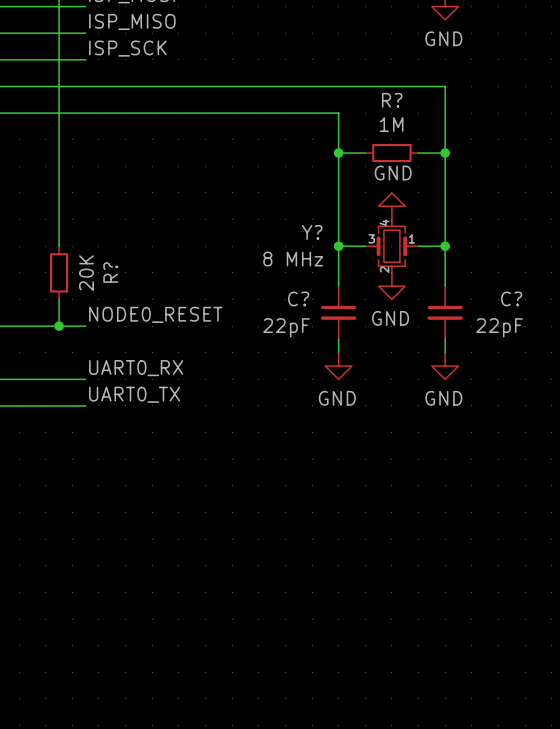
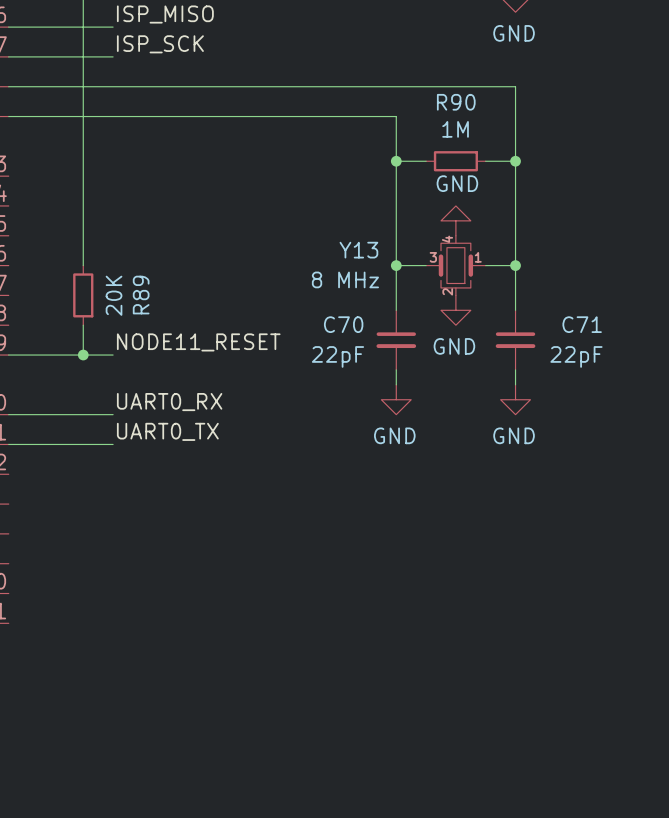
R? name: R? (392, 100) -> R90 (456, 102)
Y? name: Y? (312, 232) -> Y13 (358, 250)
R? name: R? (110, 272) -> R89 (141, 295)
C? name: C? (298, 298) -> C70 (343, 324)
C? name: C? (511, 298) -> C71 (582, 324)
label: NODE0_RESET (155, 314) -> NODE11_RESET (198, 342)

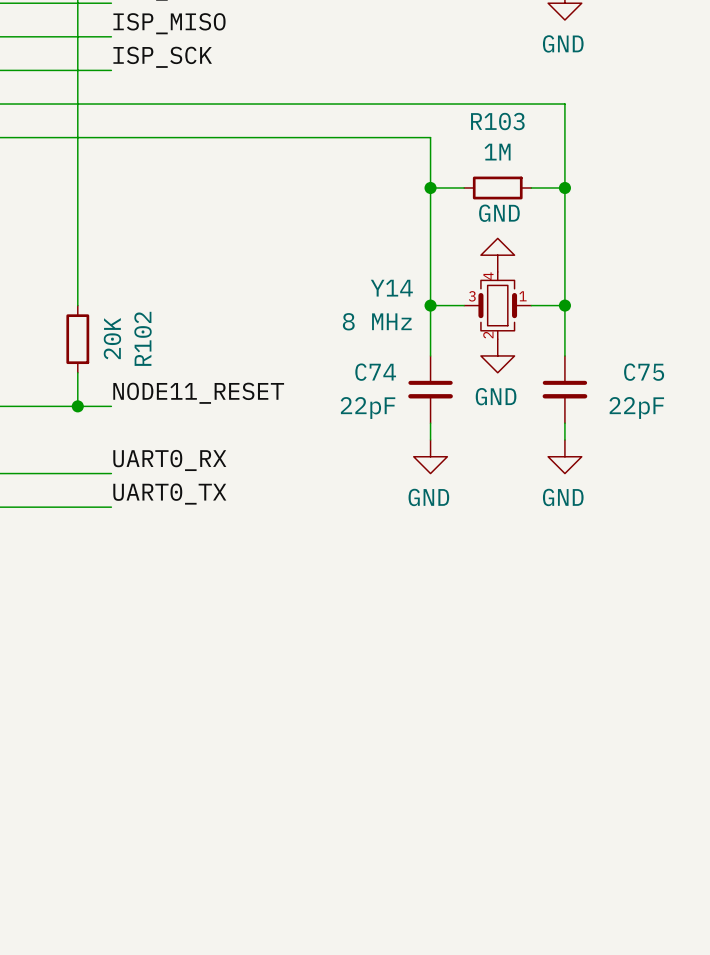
R90 name: R90 (456, 102) -> R103 (497, 121)
Y13 name: Y13 (358, 250) -> Y14 (391, 288)
R89 name: R89 (141, 295) -> R102 (143, 338)
C70 name: C70 (343, 324) -> C74 (375, 372)
C71 name: C71 (582, 324) -> C75 (644, 372)

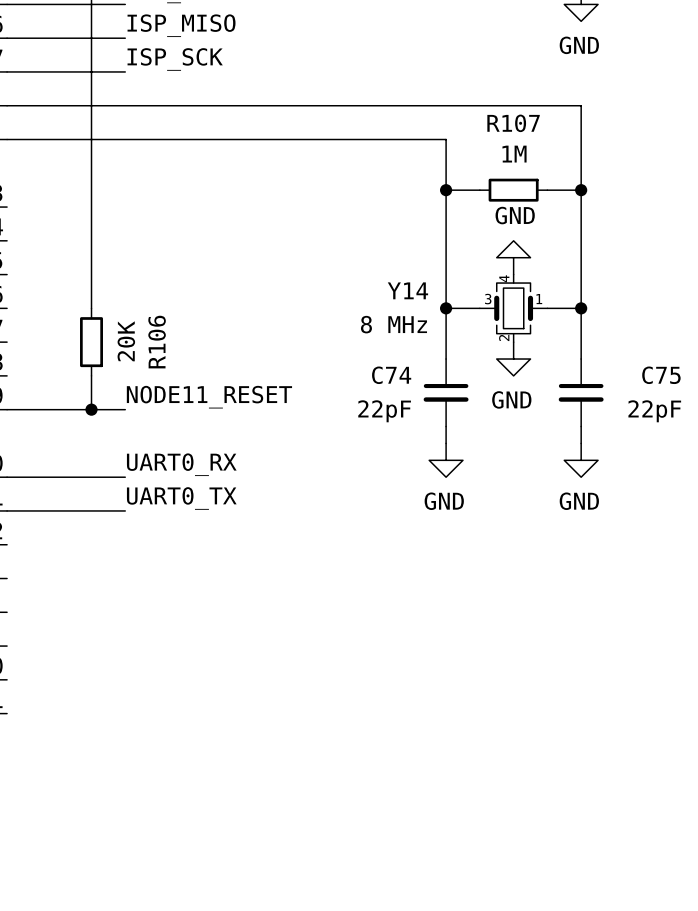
R103 name: R103 (497, 121) -> R107 (513, 123)
R102 name: R102 (143, 338) -> R106 (157, 342)

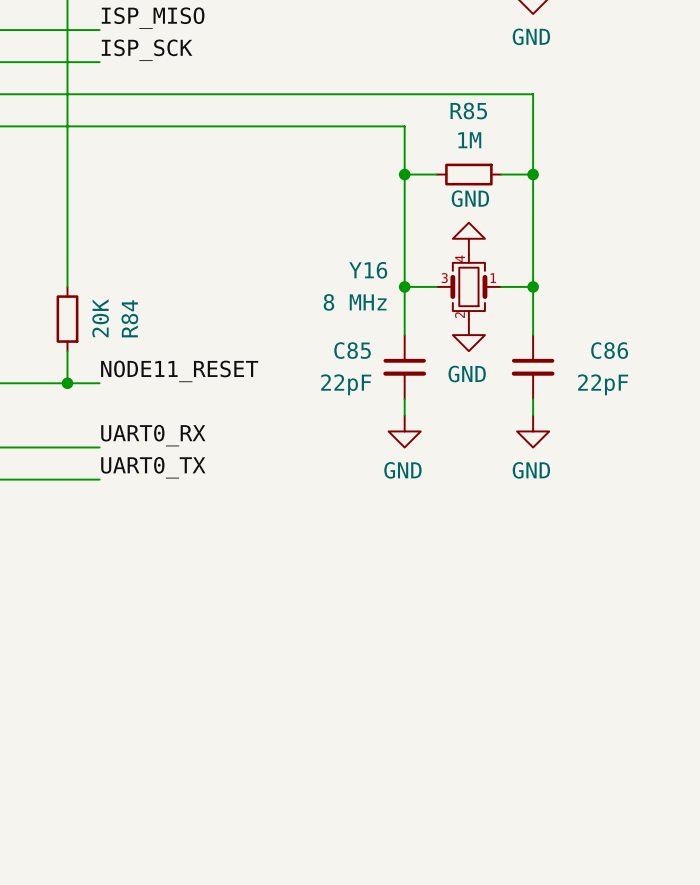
R107 name: R107 (513, 123) -> R85 (468, 111)
Y14 name: Y14 (407, 290) -> Y16 (368, 270)
R106 name: R106 (157, 342) -> R84 (129, 318)
C74 name: C74 (391, 375) -> C85 (352, 350)
C75 name: C75 (661, 375) -> C86 (609, 350)

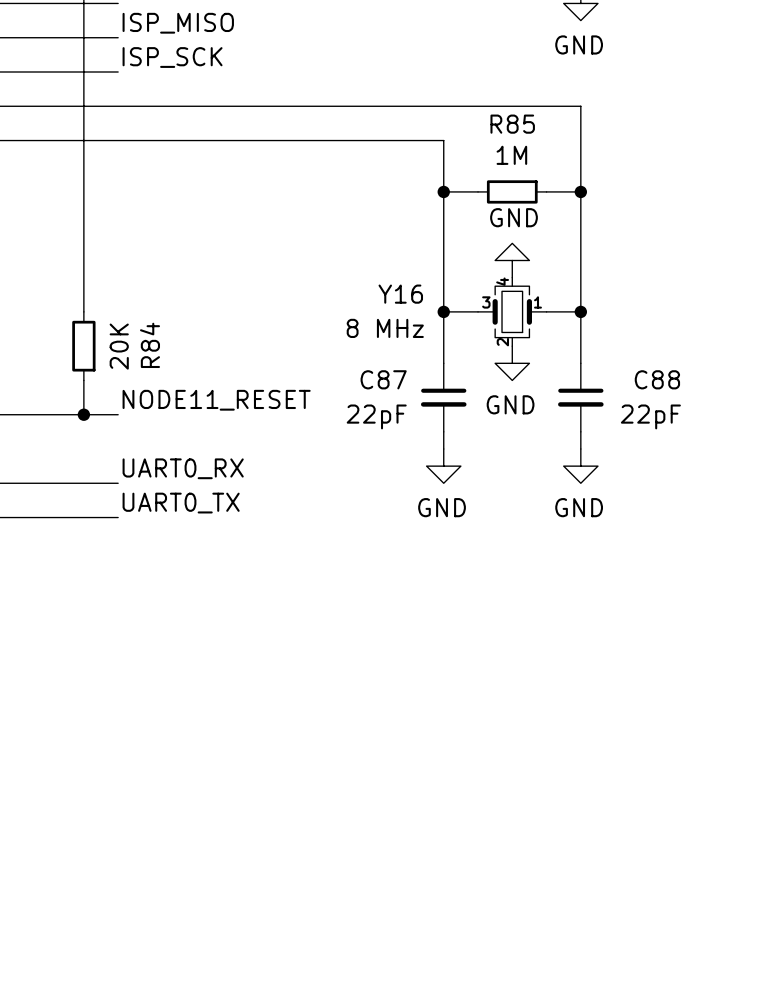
C85 name: C85 (352, 350) -> C87 (383, 379)
C86 name: C86 (609, 350) -> C88 (657, 379)

